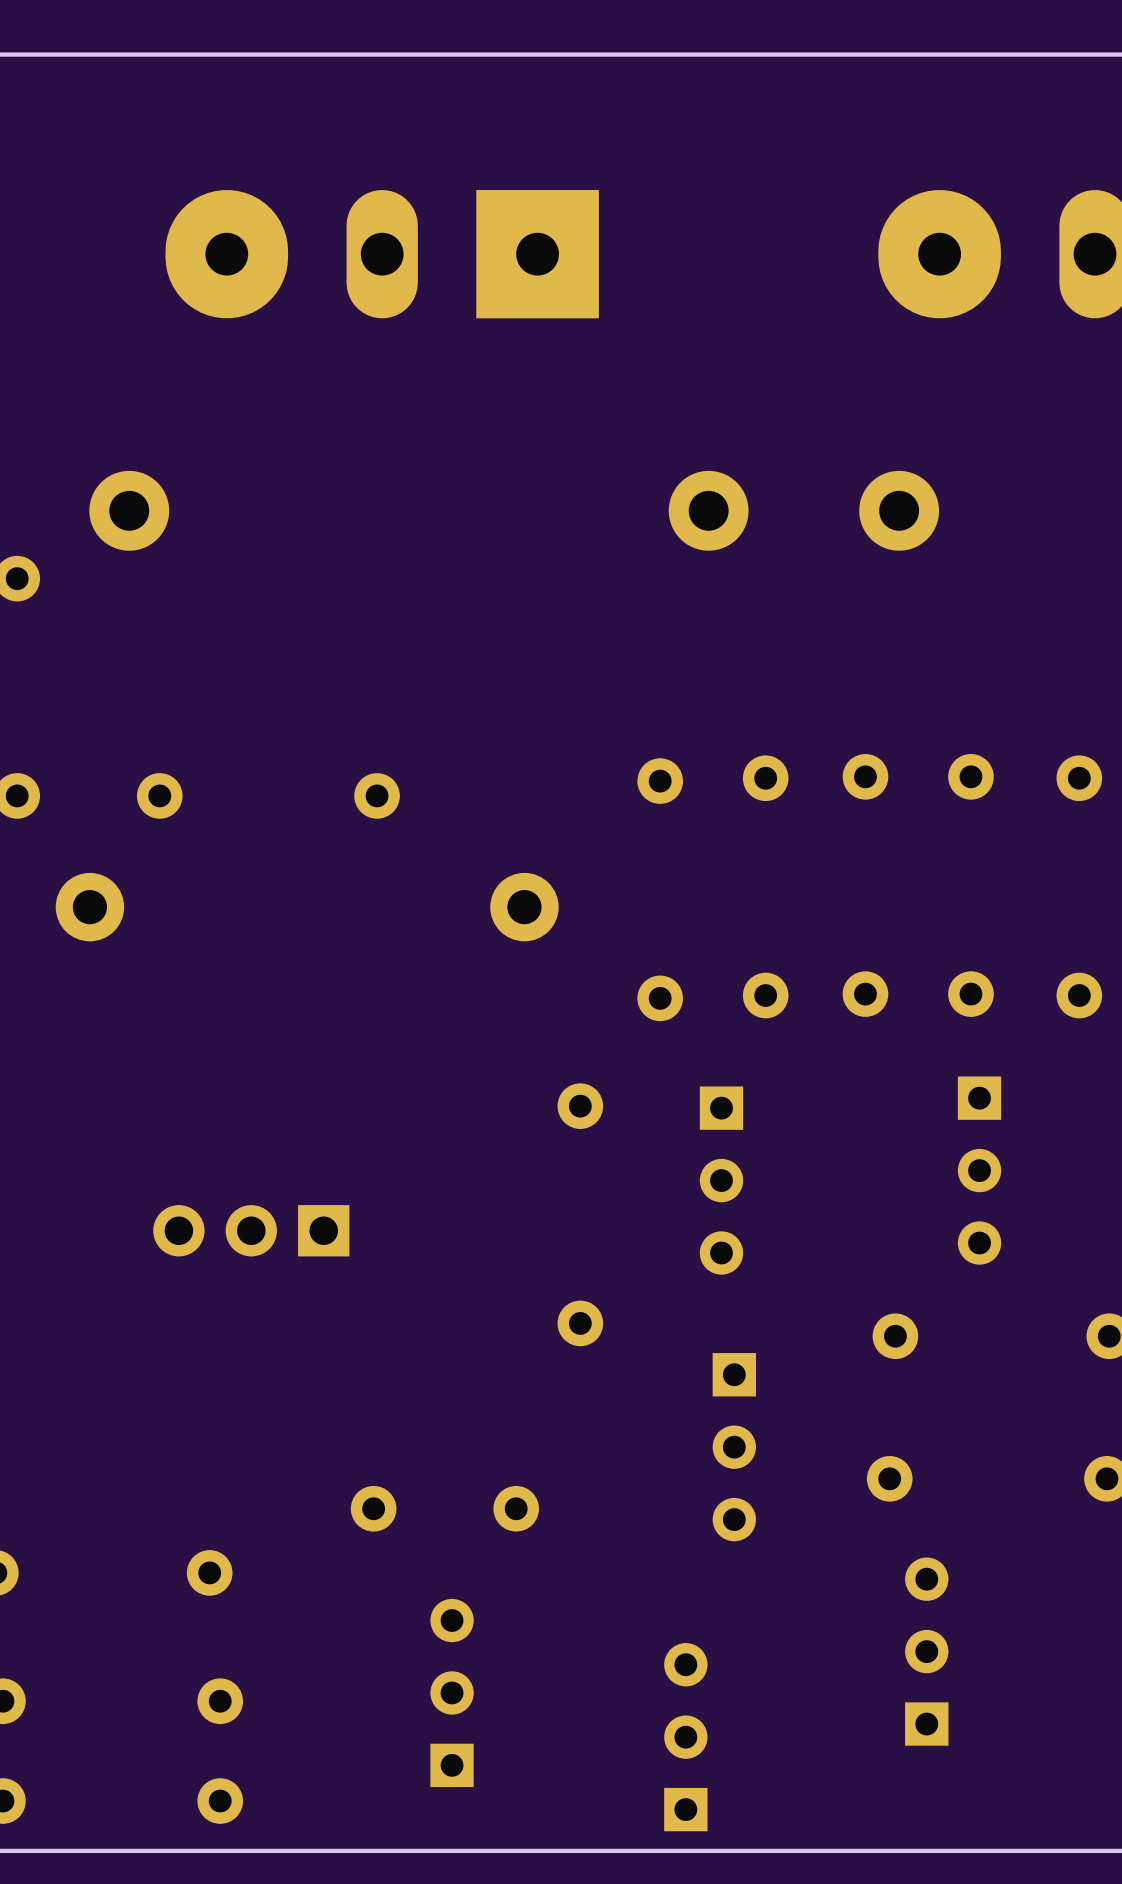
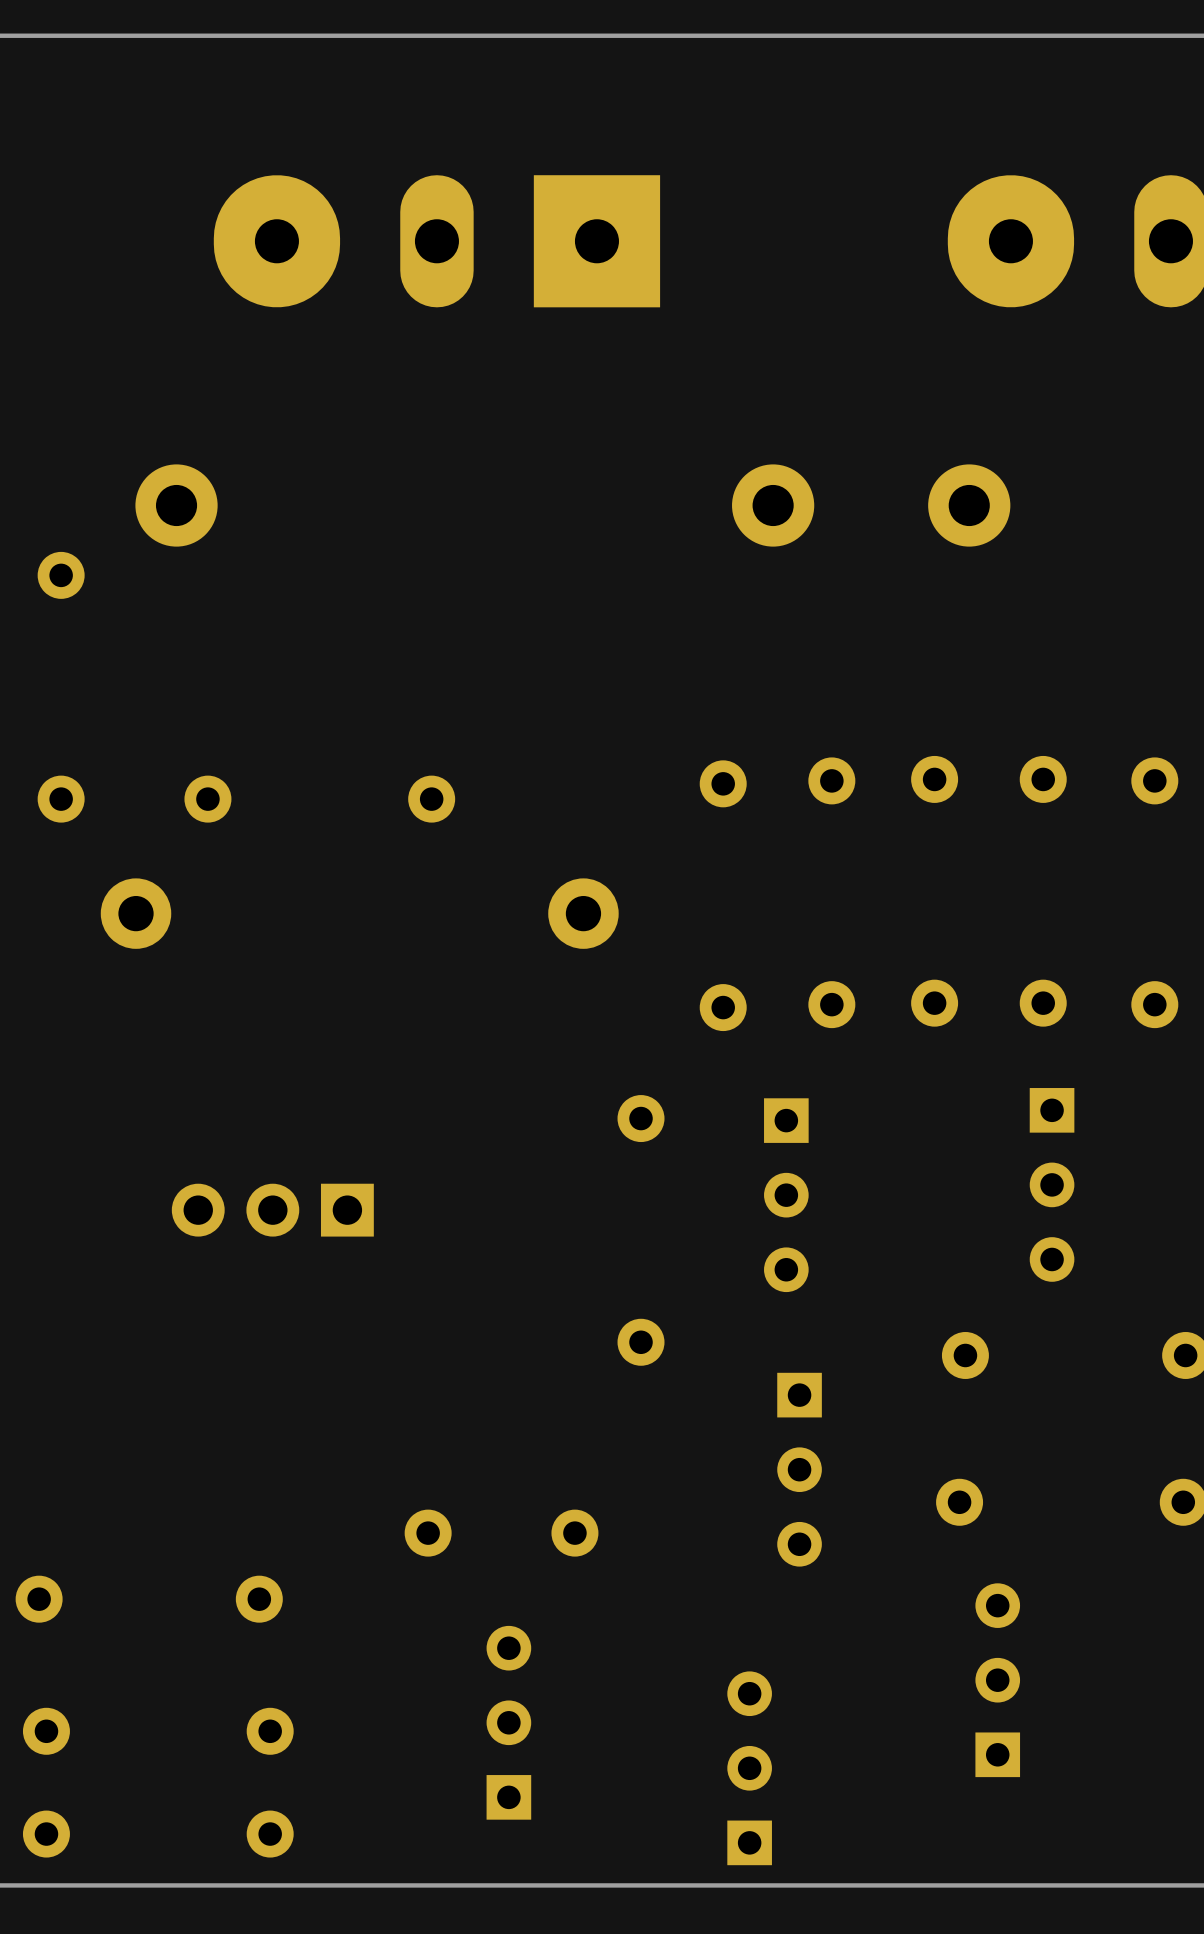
part position: (251, 1230) -> (272, 1210)

